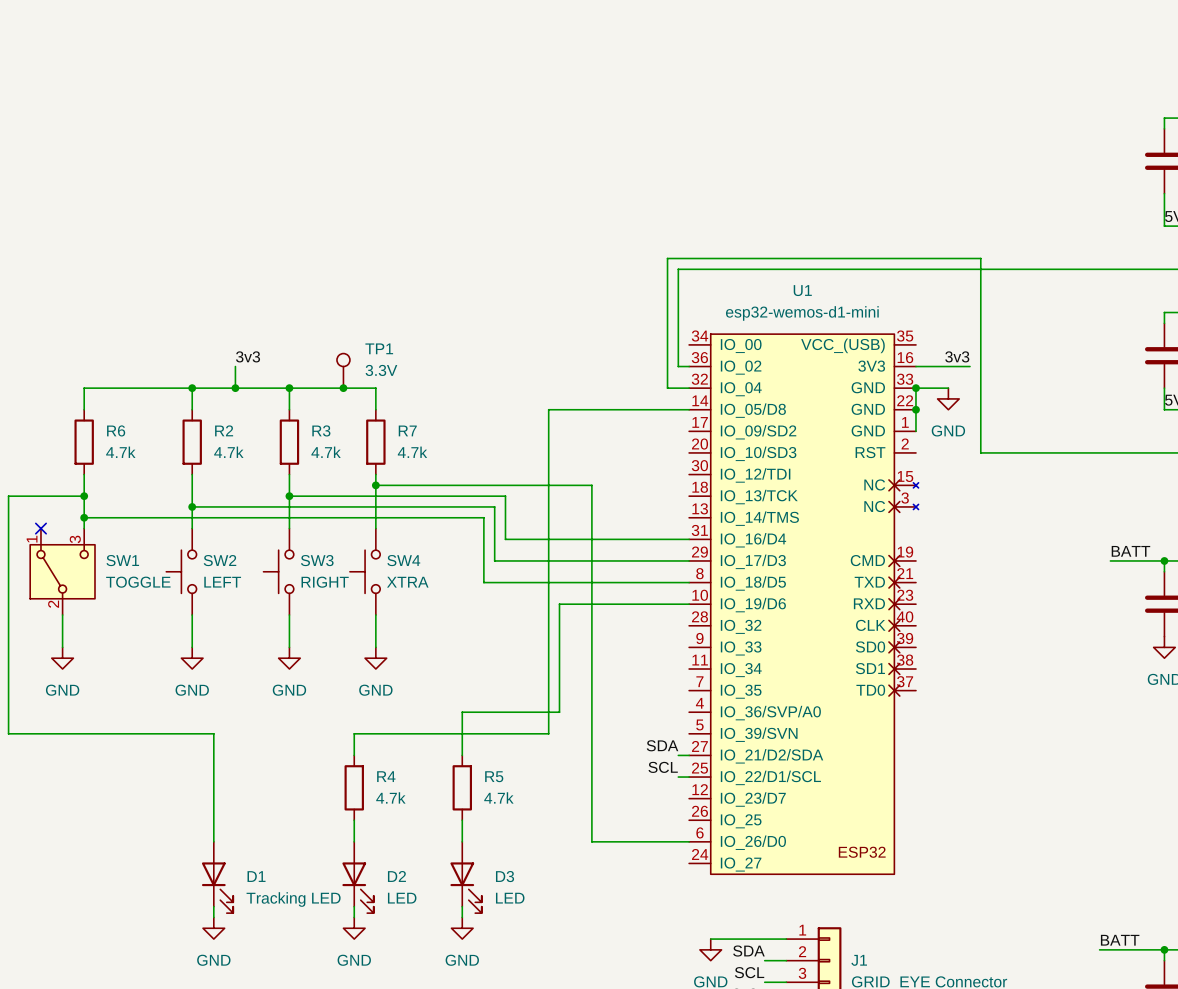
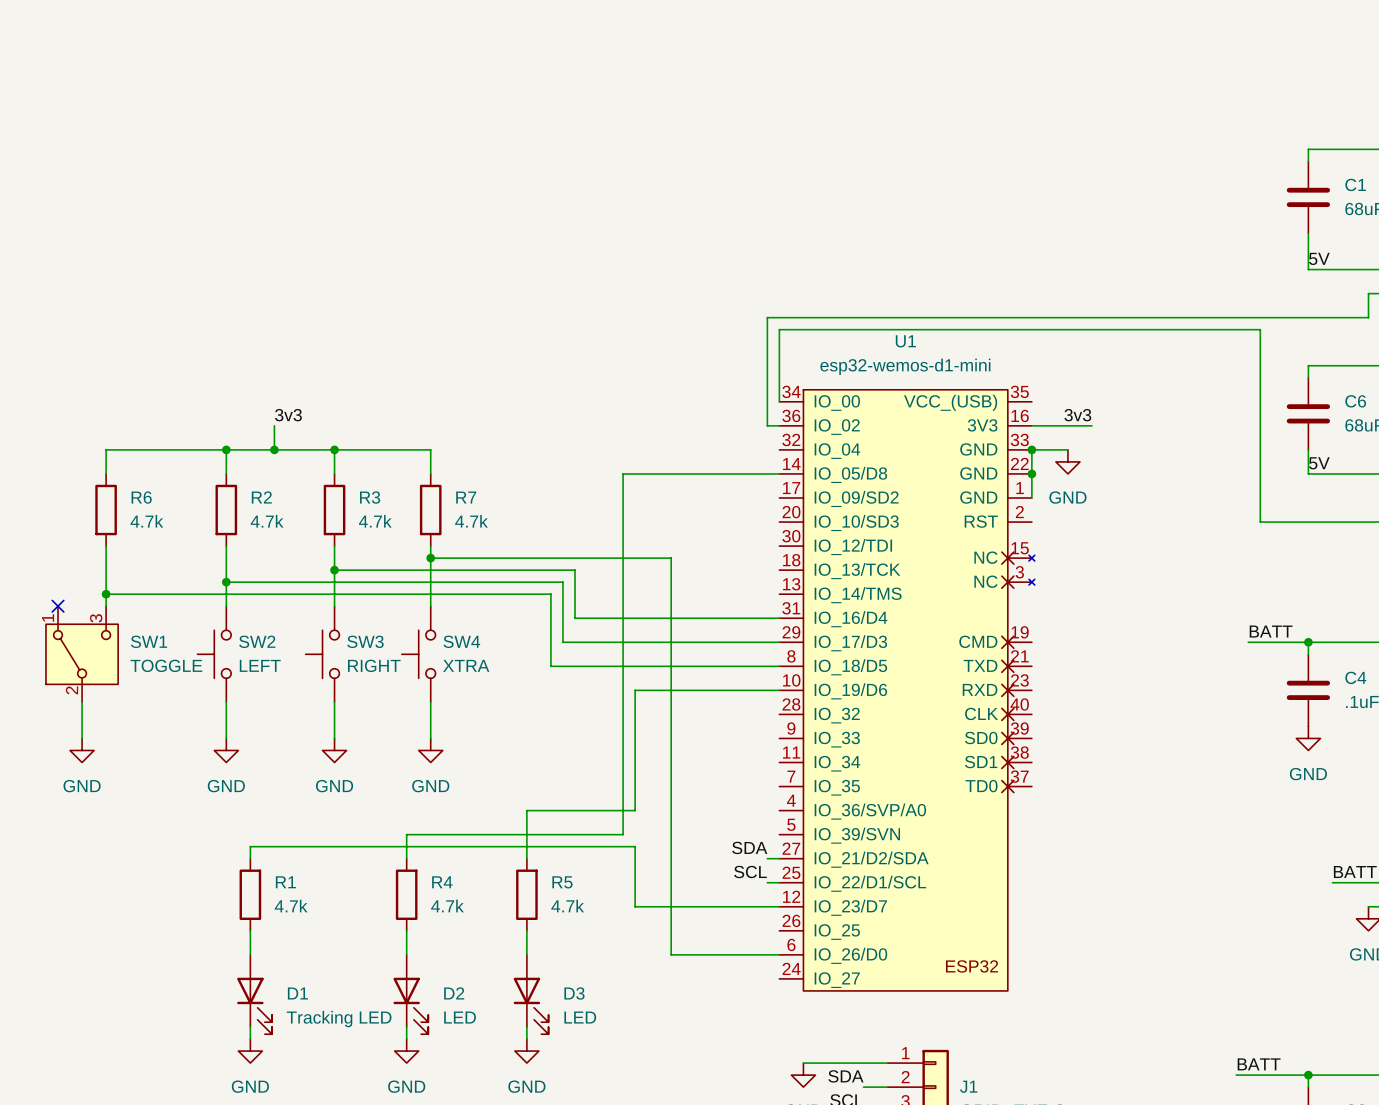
TP1: 3.3V (343, 370) -> none
junction: (343, 388) -> none
wire: (689, 388) (667, 388) (667, 258) (980, 258) (980, 452) (1121, 452) -> (779, 401) (779, 329) (1260, 329) (1260, 522)
wire: (84, 496) (8, 496) (8, 733) (213, 733) (213, 744) -> (779, 906) (635, 906) (635, 846) (250, 846)
junction: (84, 496) -> none
wire: (213, 755) (213, 820) -> none
R1: none -> 4.7k (250, 894)

